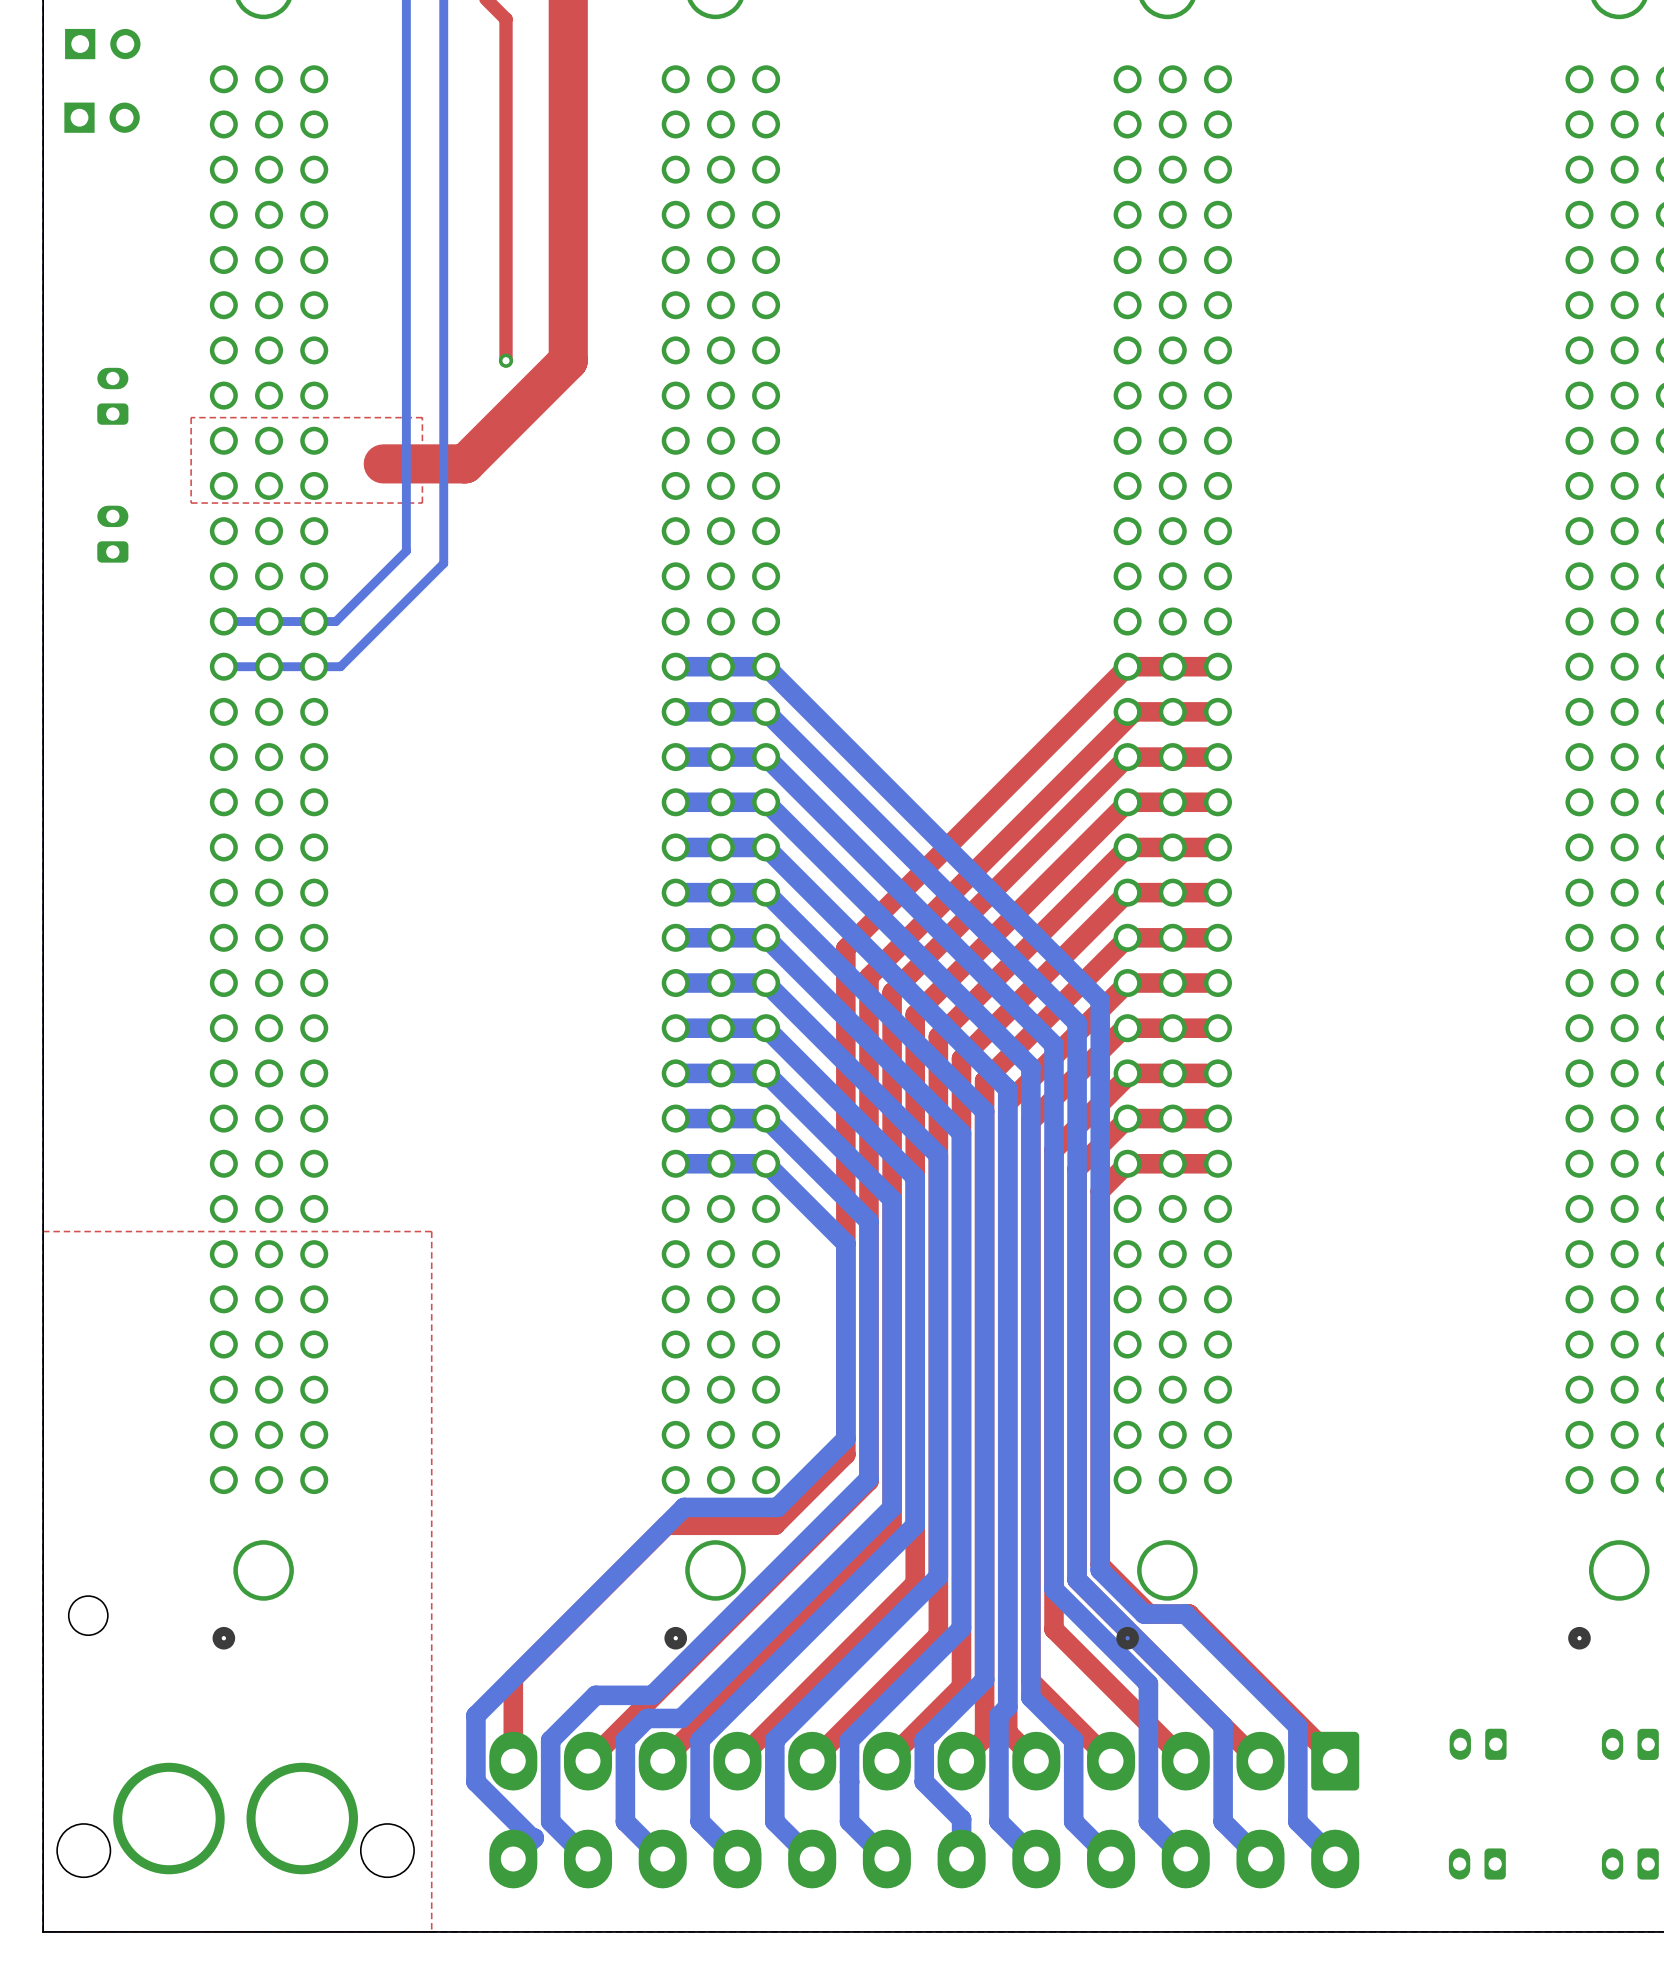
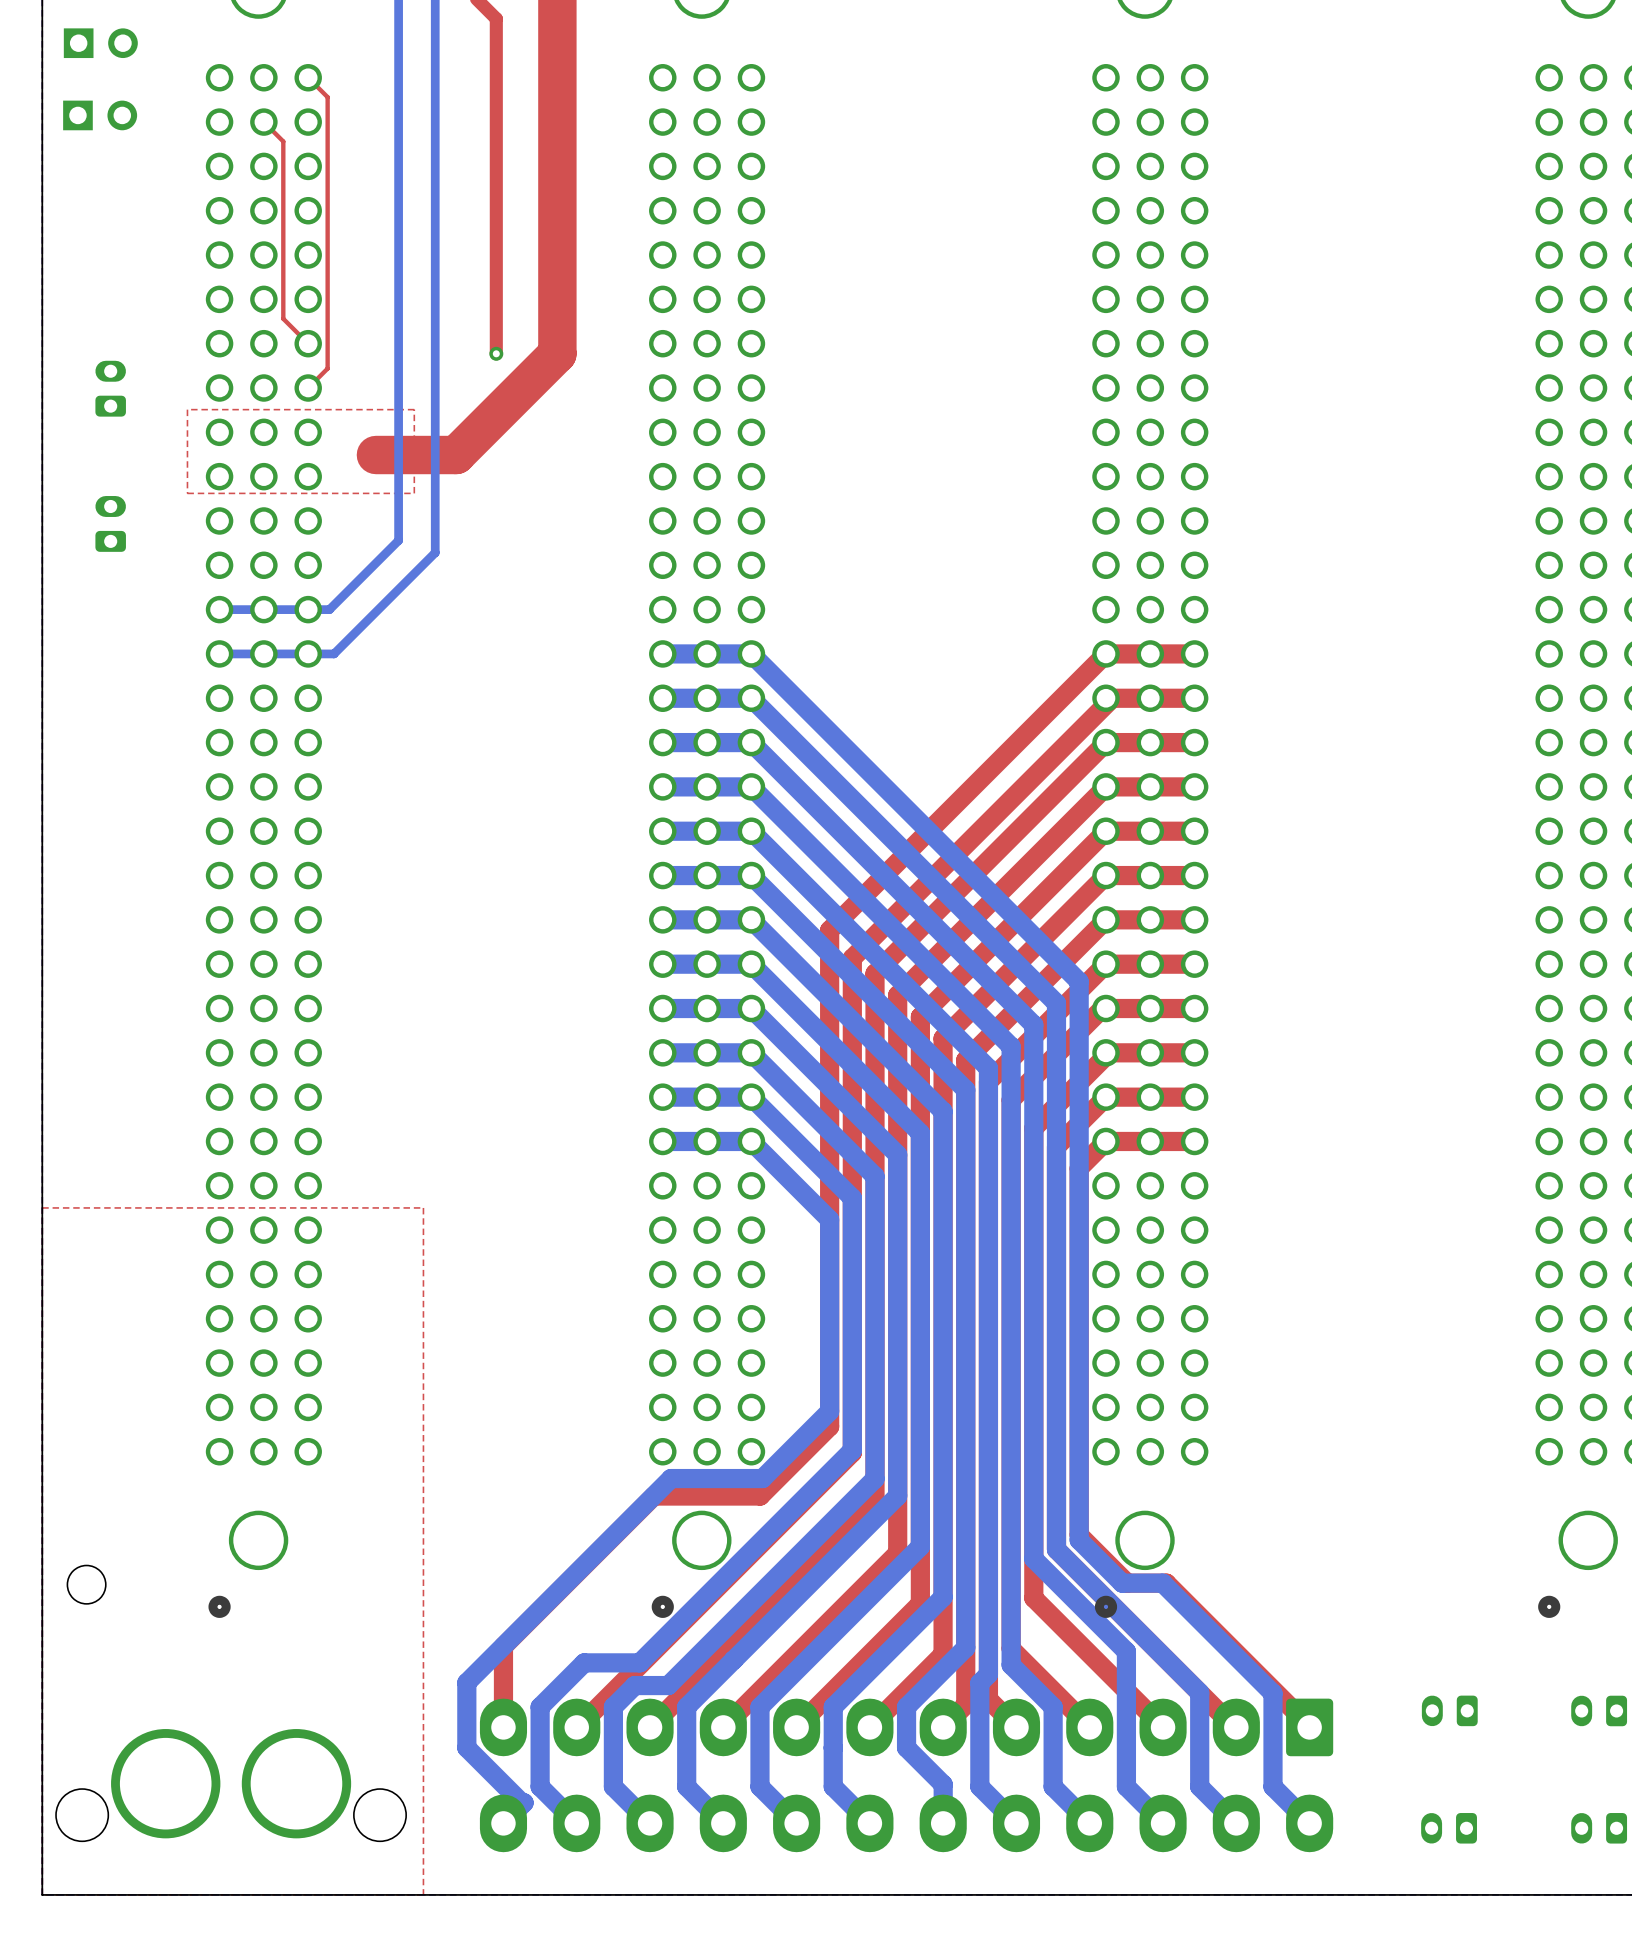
top track: none -> (308, 77) (327, 97) (327, 368) (308, 388)
top track: none -> (263, 122) (283, 141) (283, 318) (308, 343)

